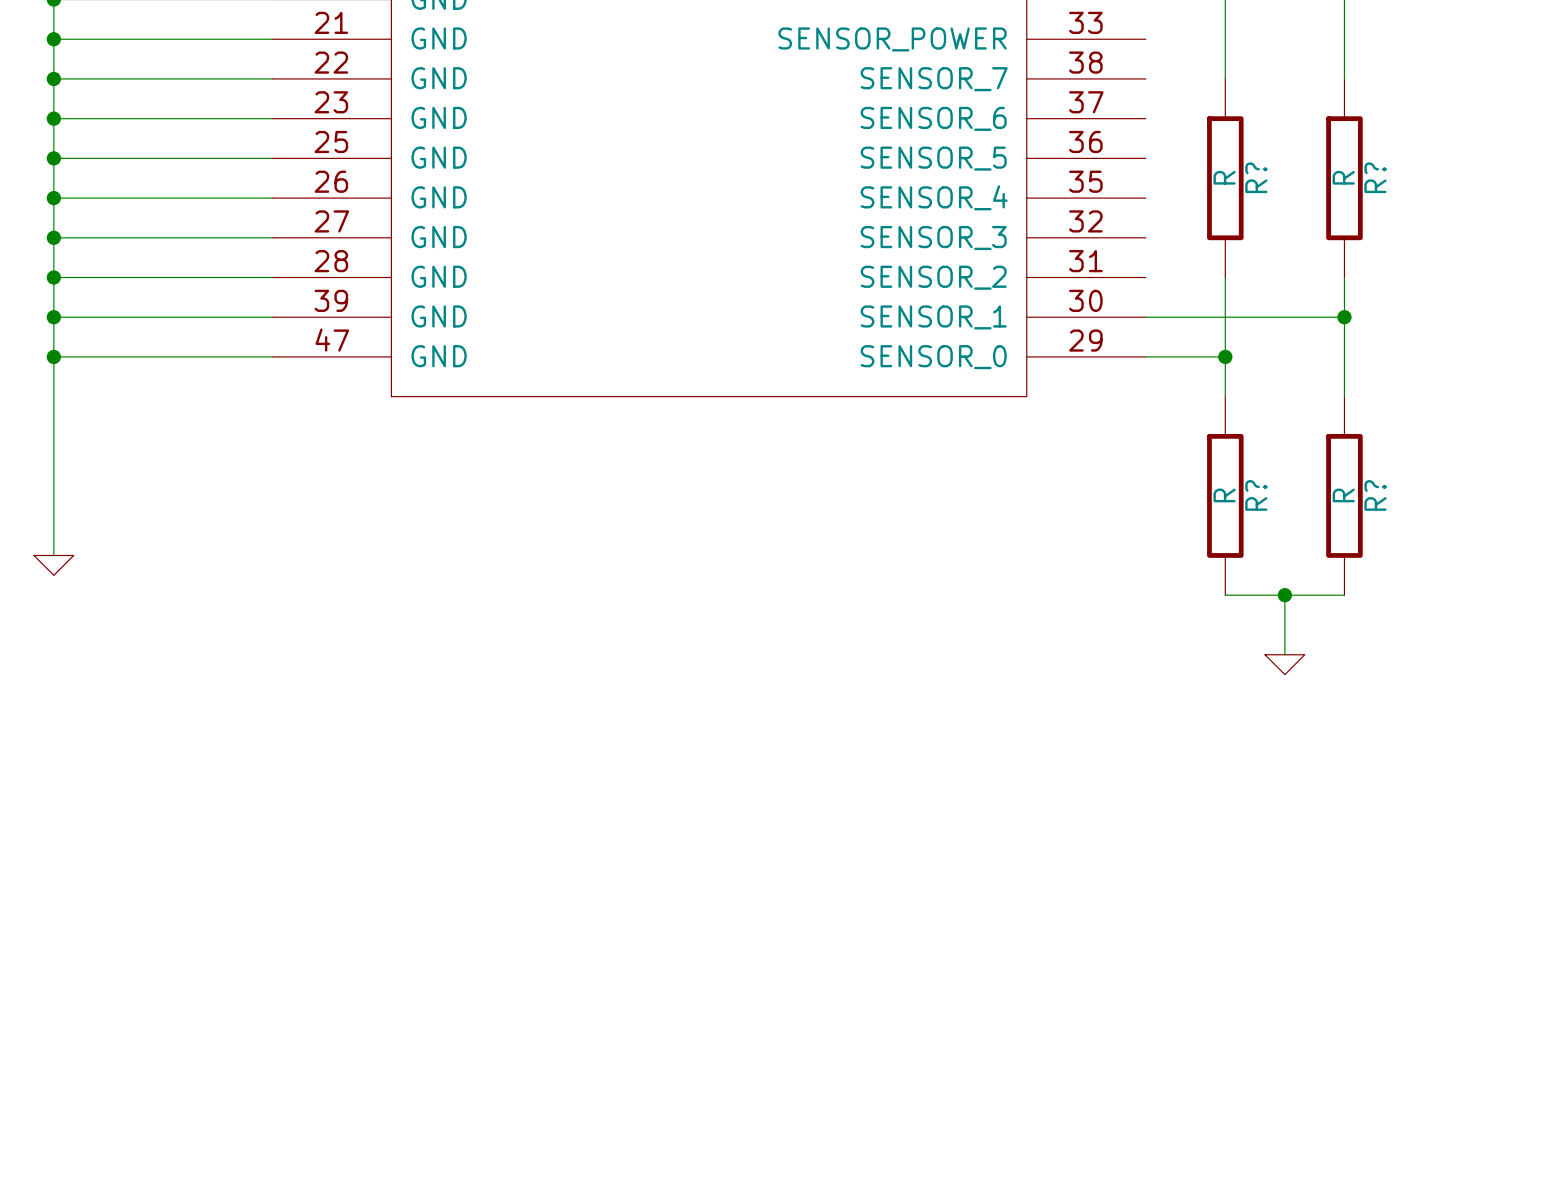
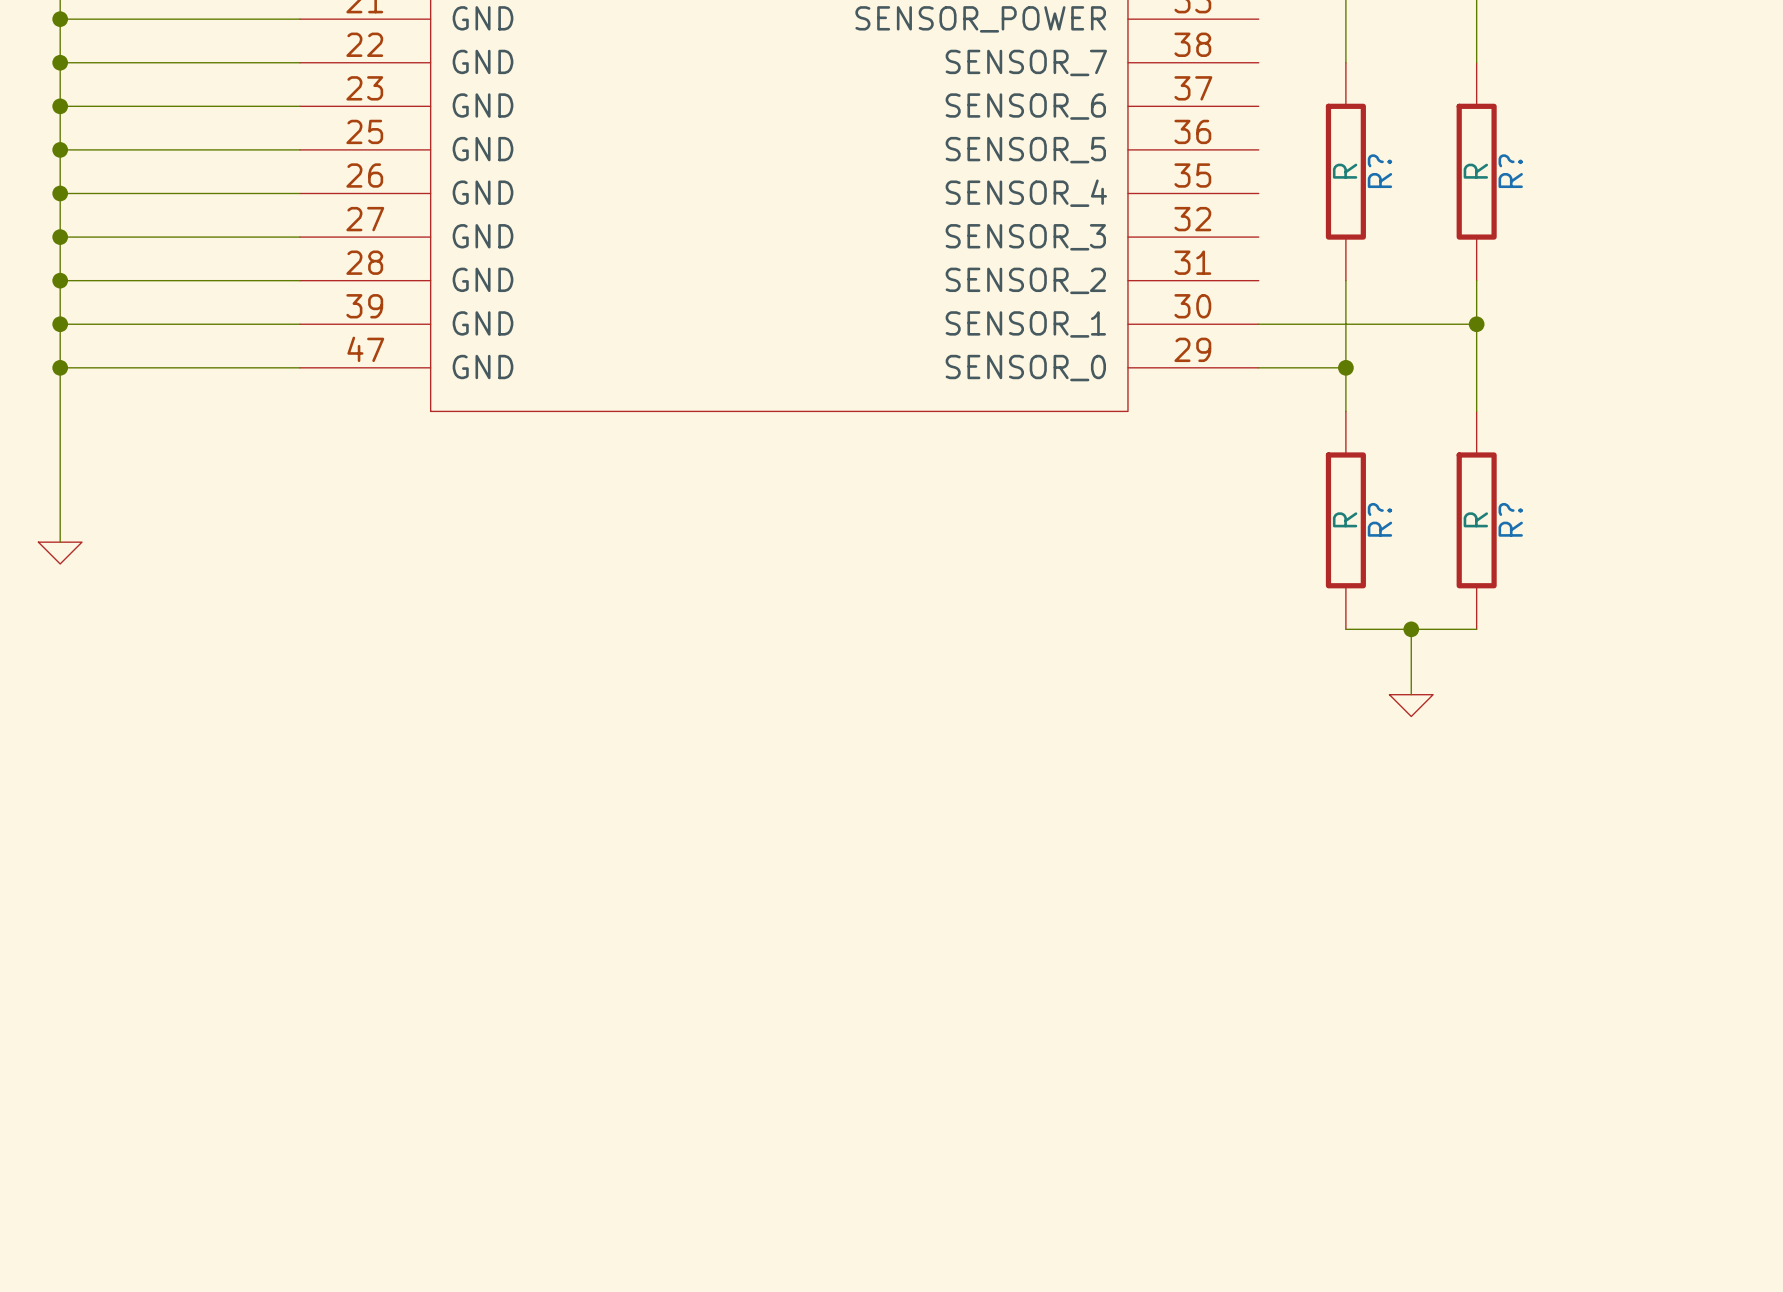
wire: (53, 515) (53, 555) -> none
power symbol position: (53, 565) -> (60, 553)

